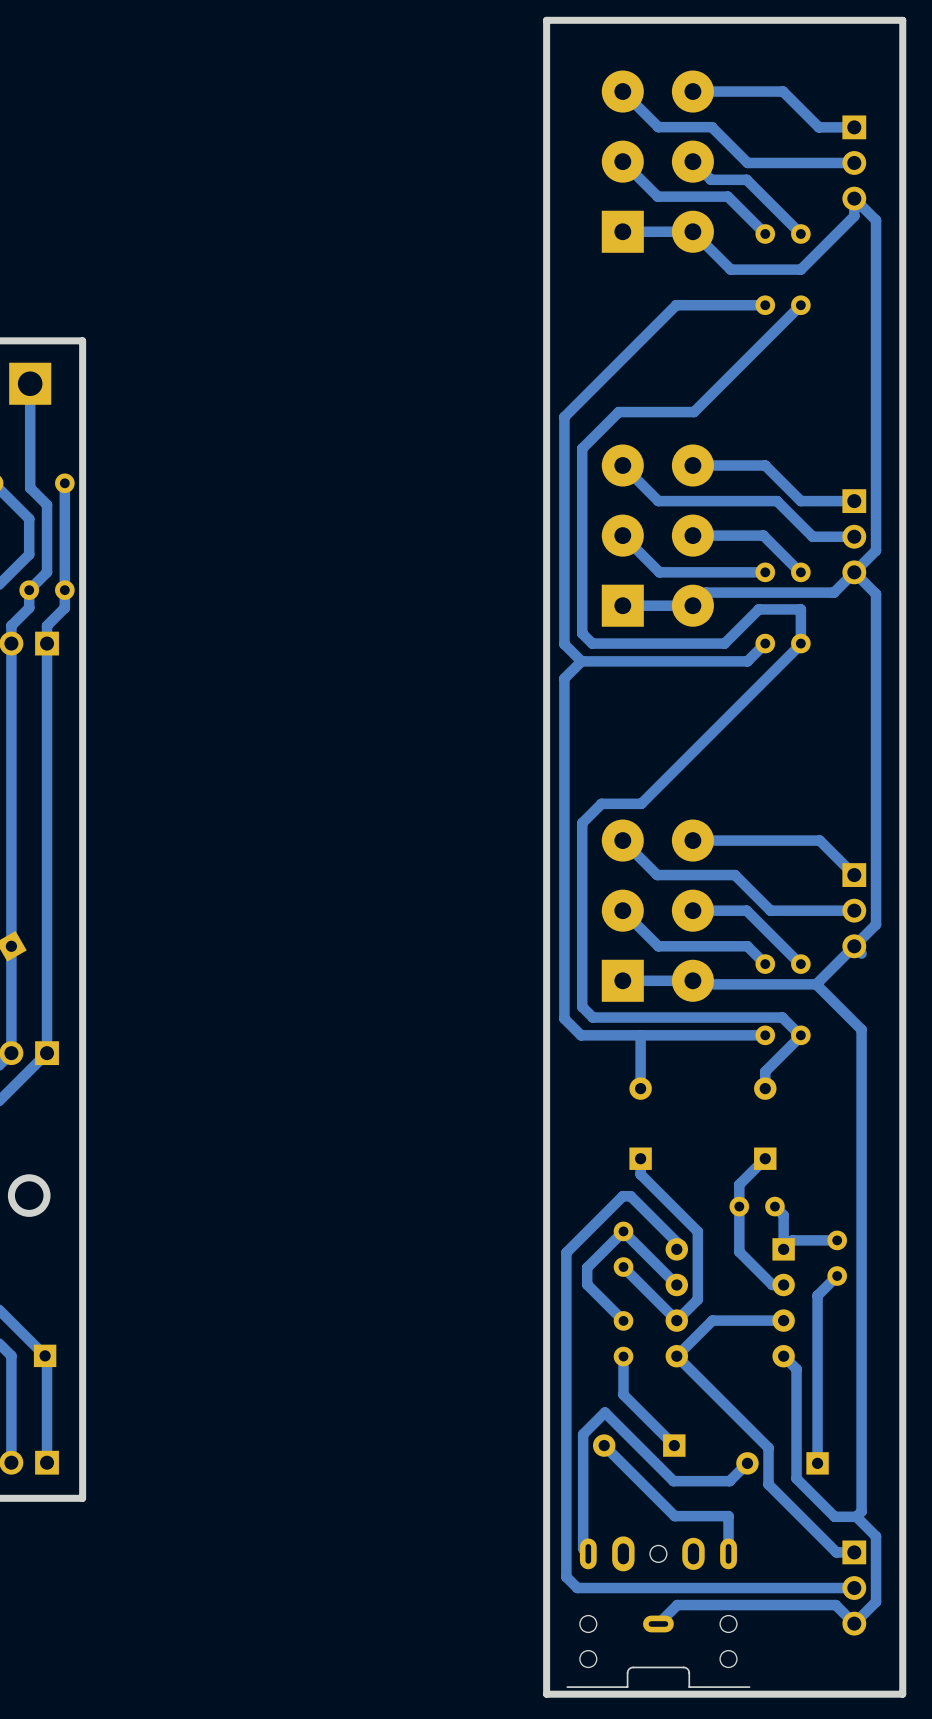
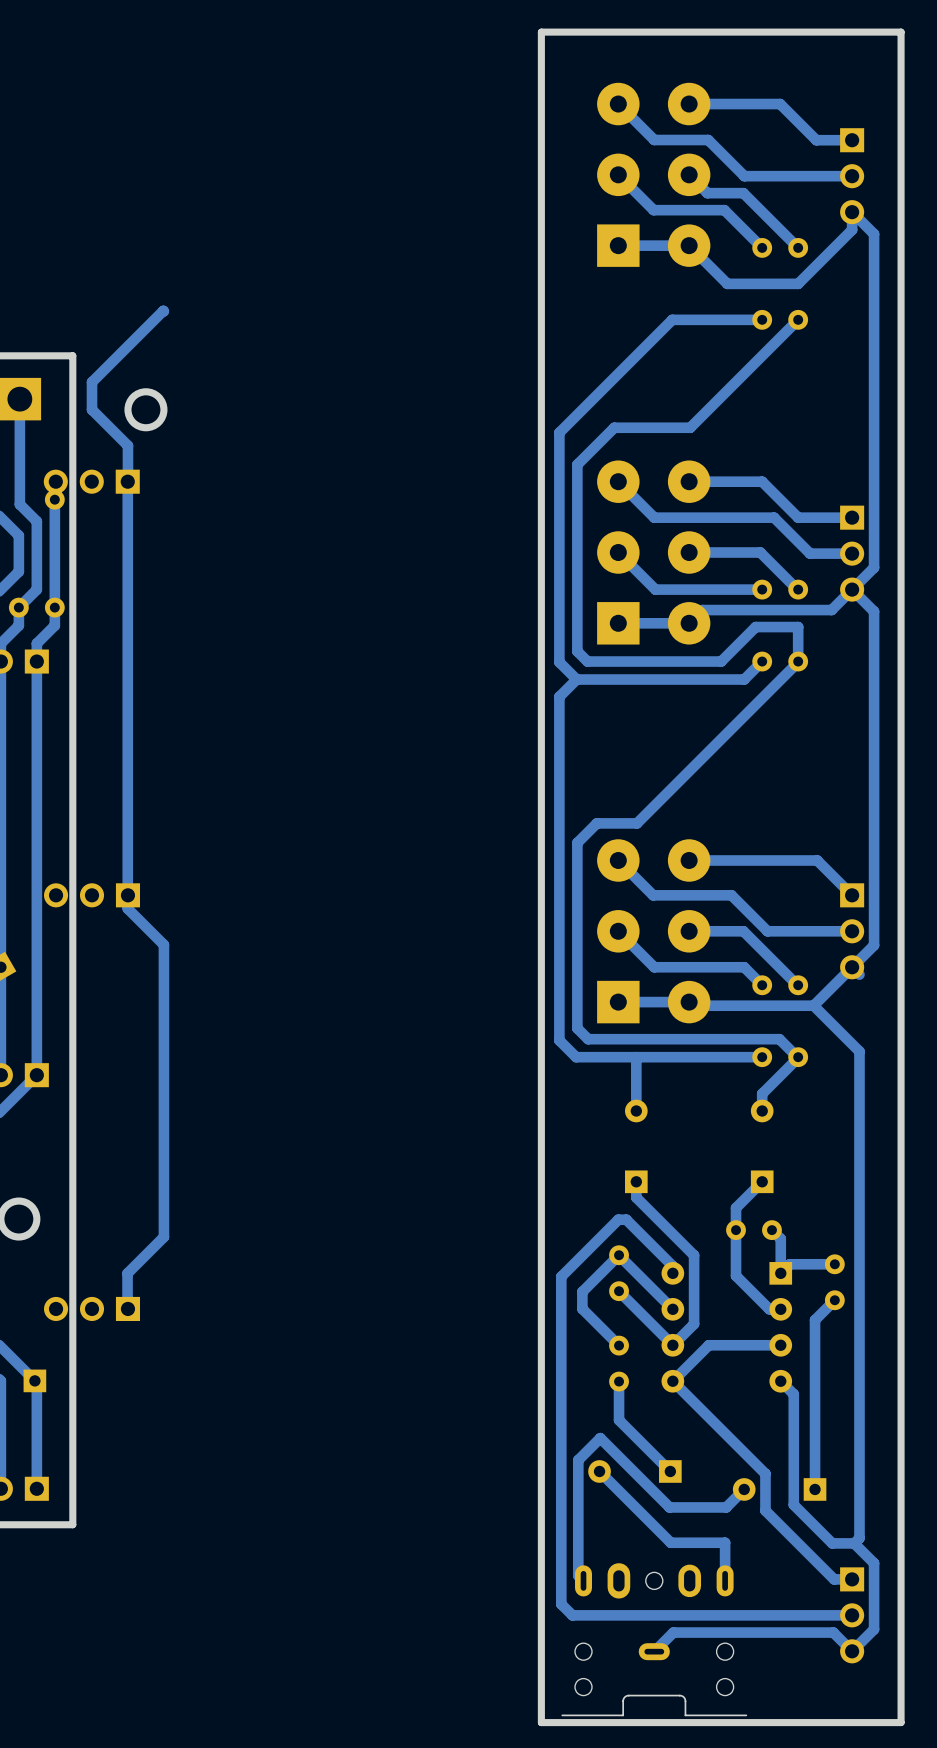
track: none -> (163, 311) (92, 382) (92, 409) (127, 445) (127, 908) (163, 944) (163, 1237) (127, 1273) (127, 1299)
round board edge: none -> [124, 388, 168, 432]
part: none -> (91, 481)
part: none -> (92, 895)
part: none -> (92, 1308)

